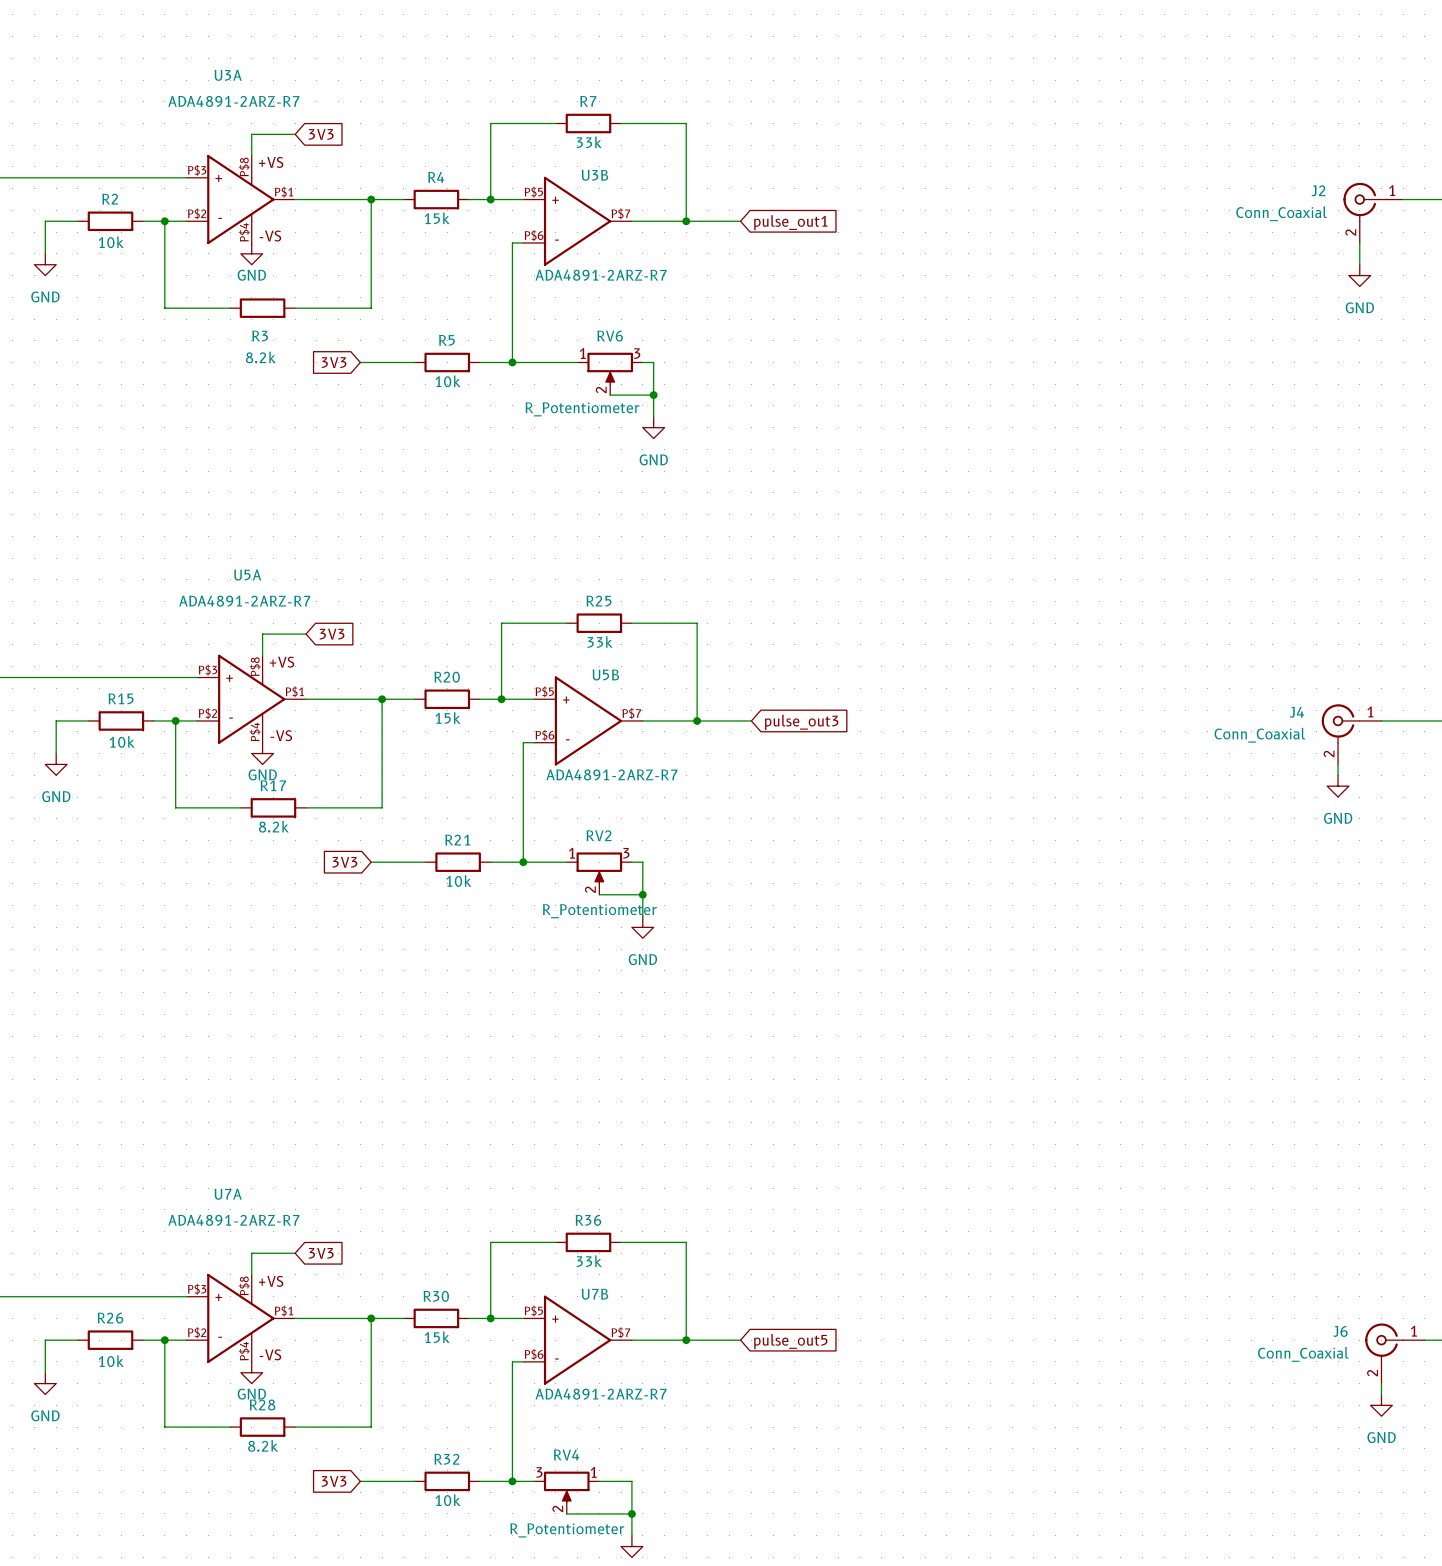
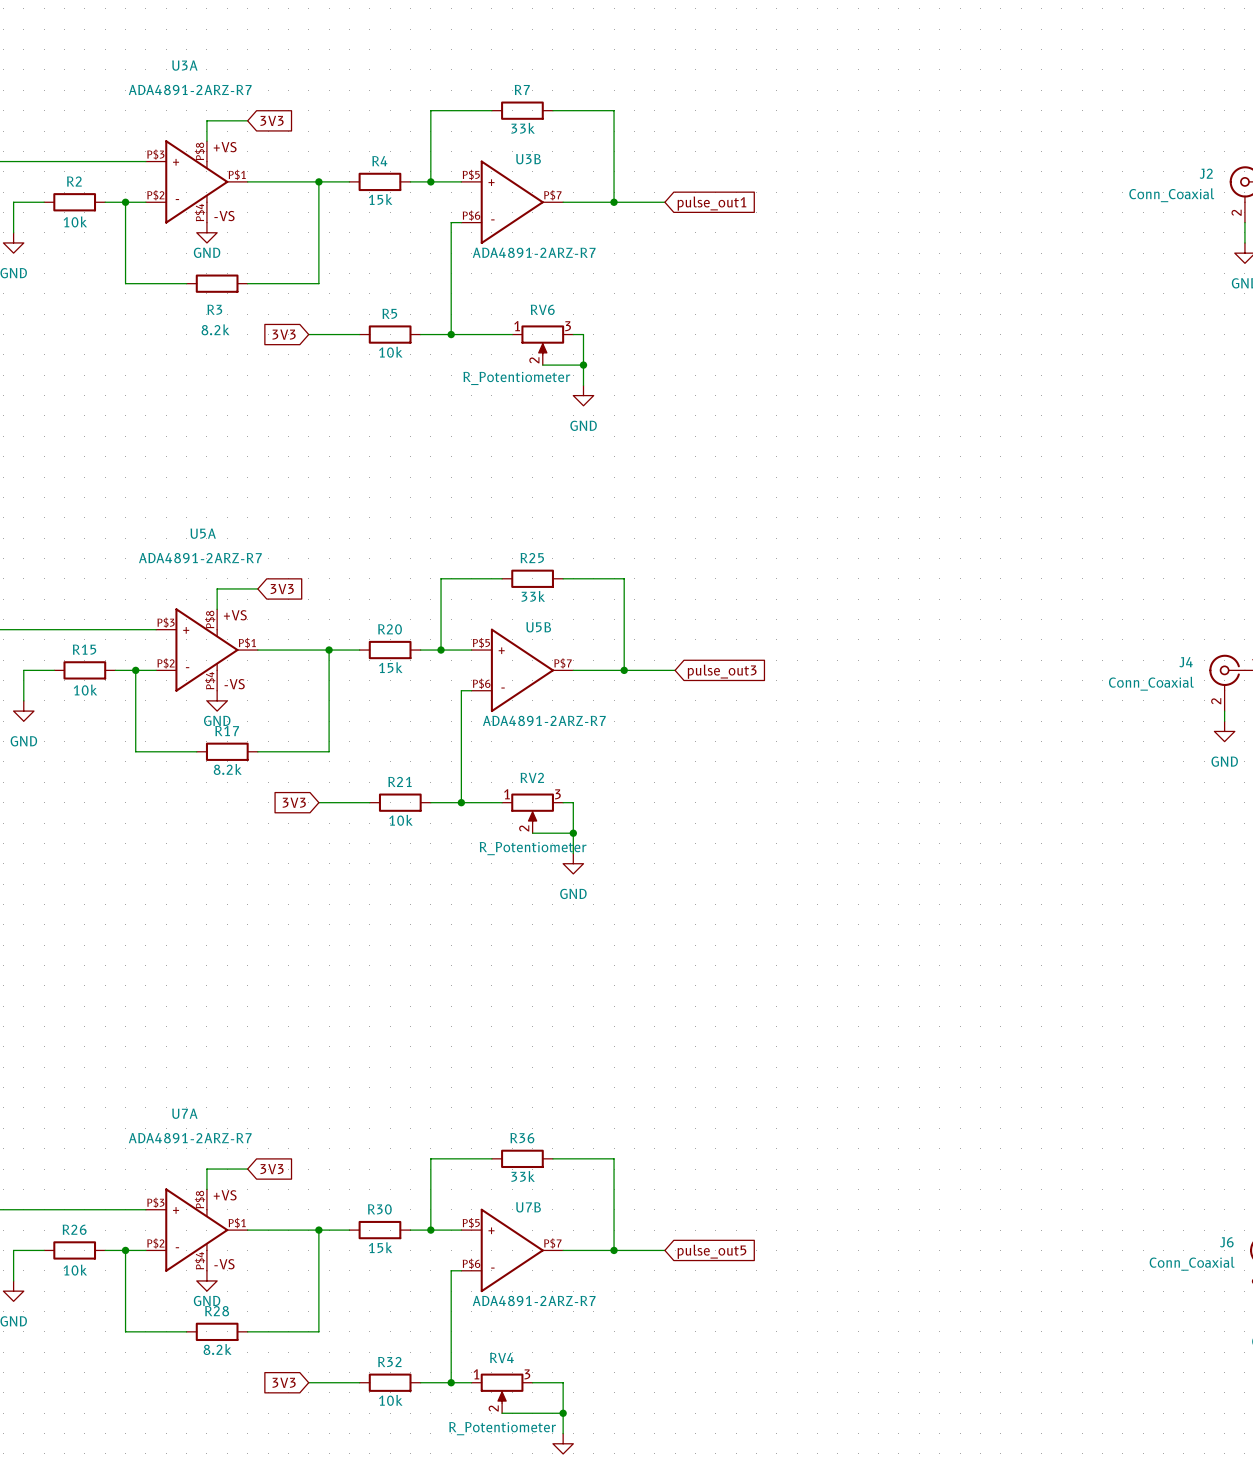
RV4 flip: as is (566, 1487) -> left-right (502, 1388)

